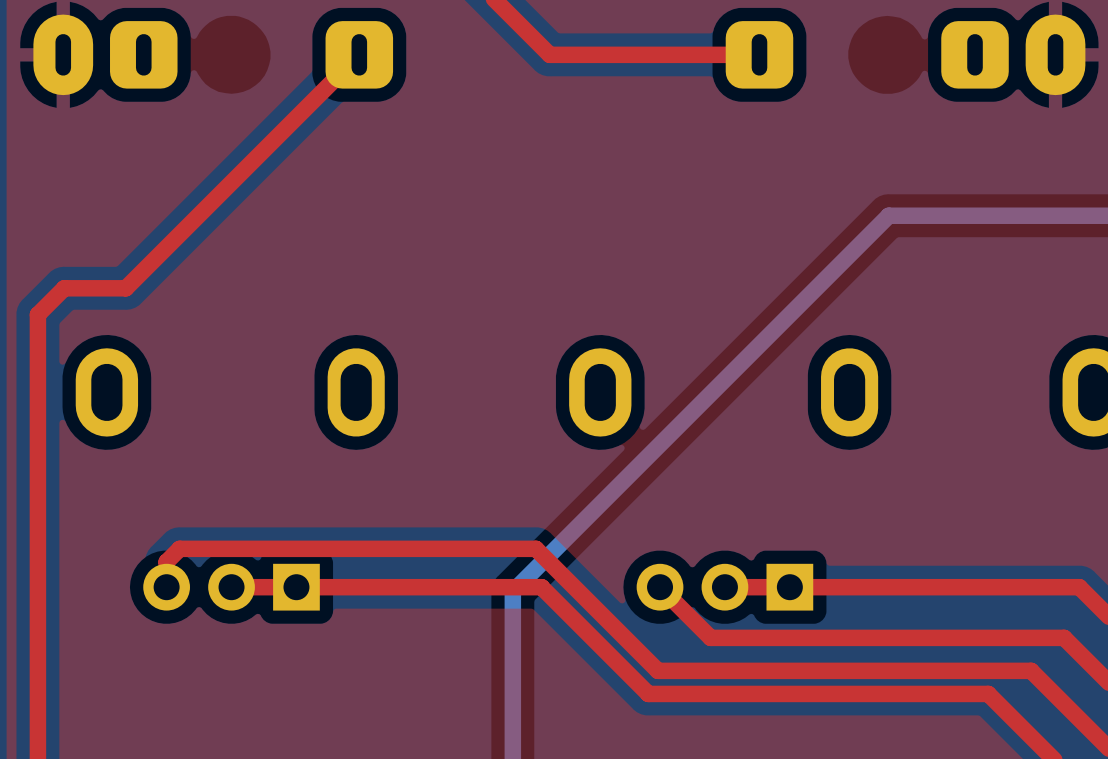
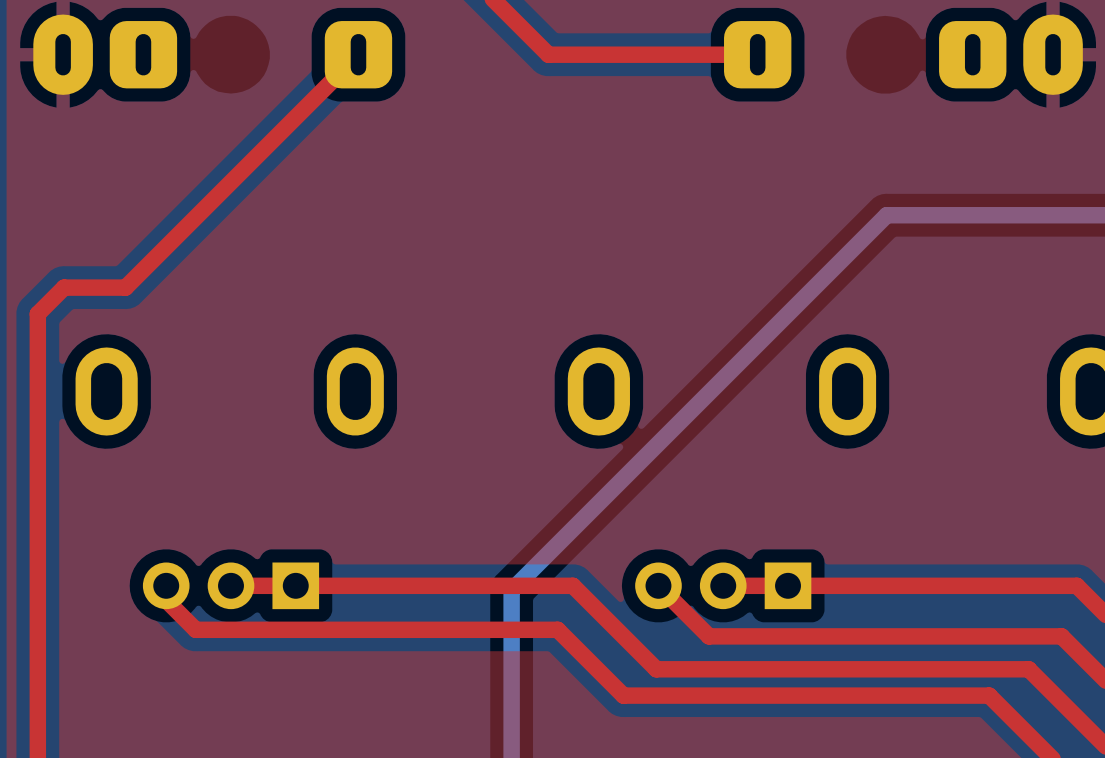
top track: (166, 587) (166, 561) (179, 548) (535, 548) (574, 587) -> (540, 585) (572, 585)
top track: (541, 587) (648, 693) (988, 693) (991, 697) -> (166, 600) (195, 629) (557, 629) (623, 695) (989, 695)

